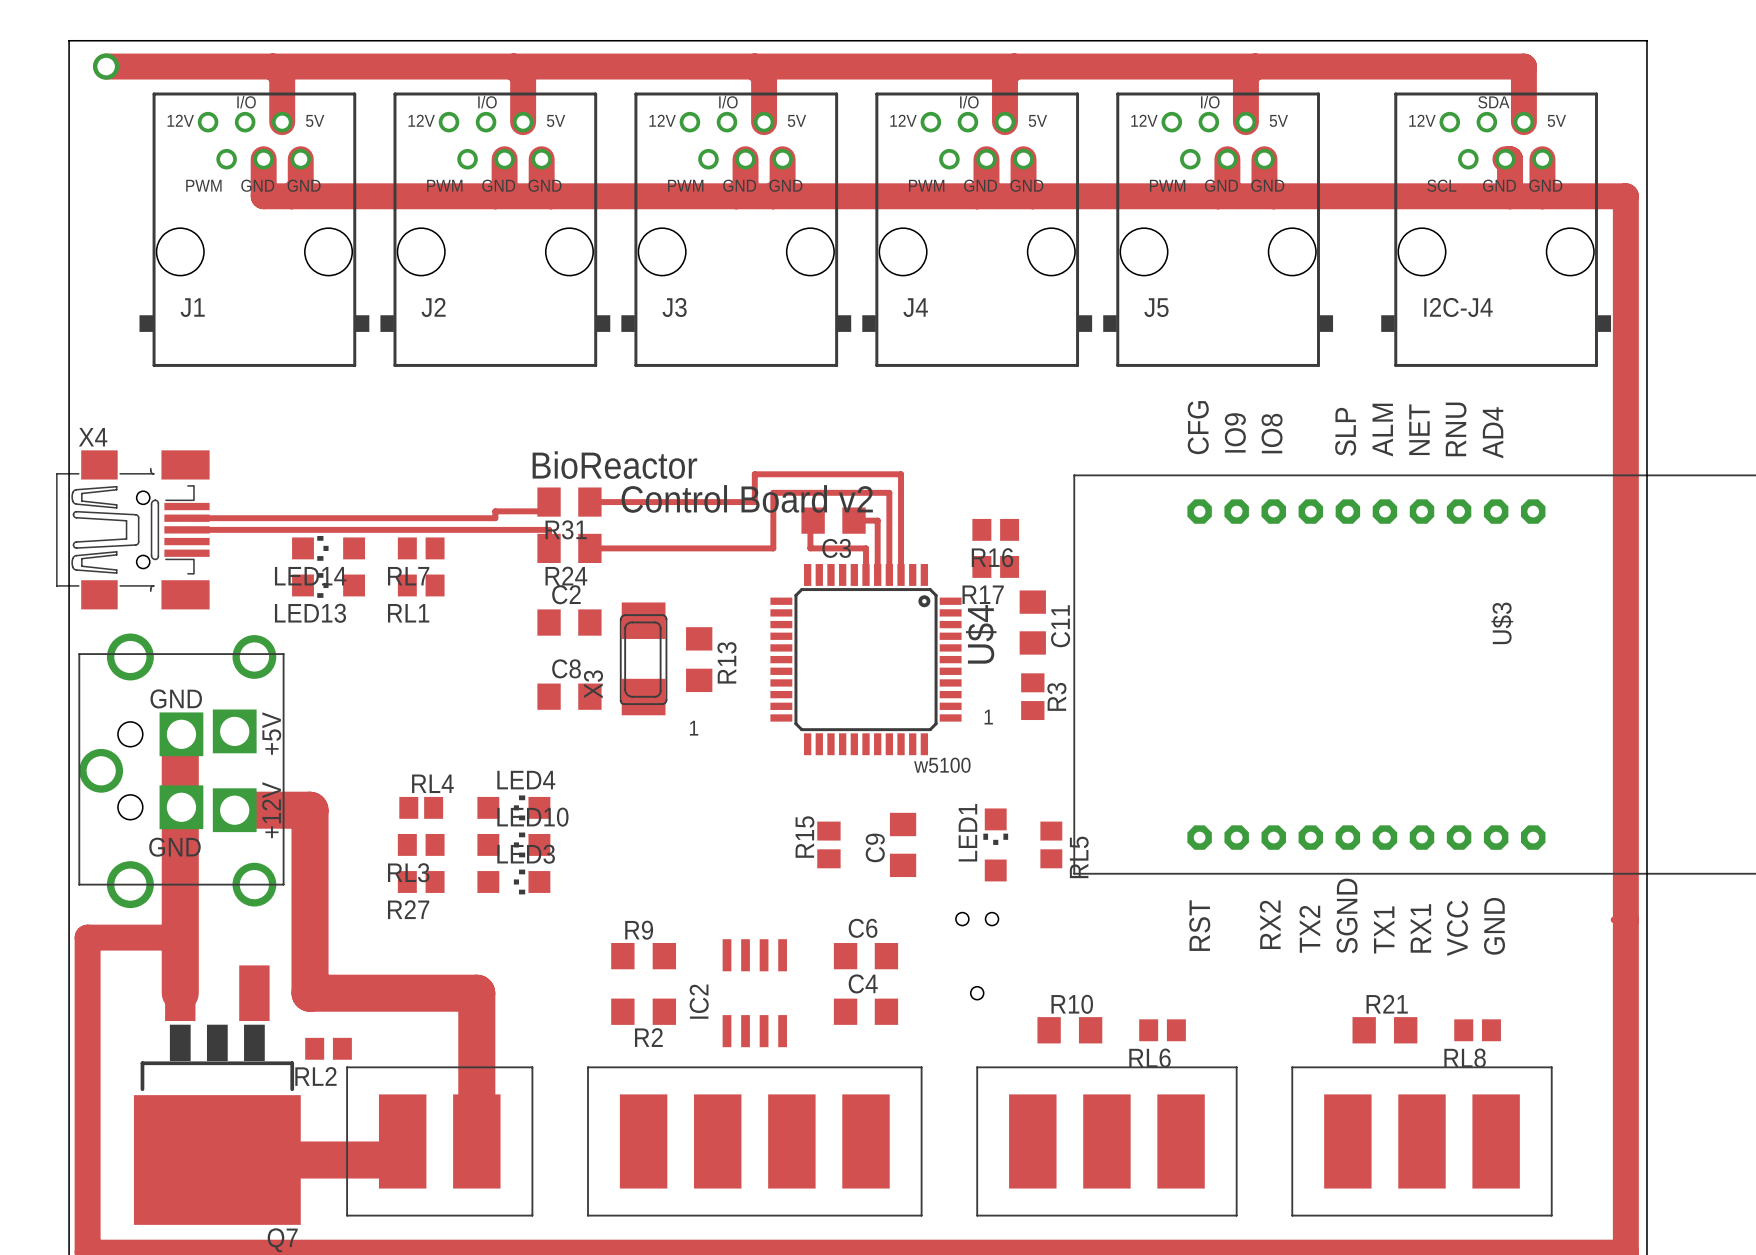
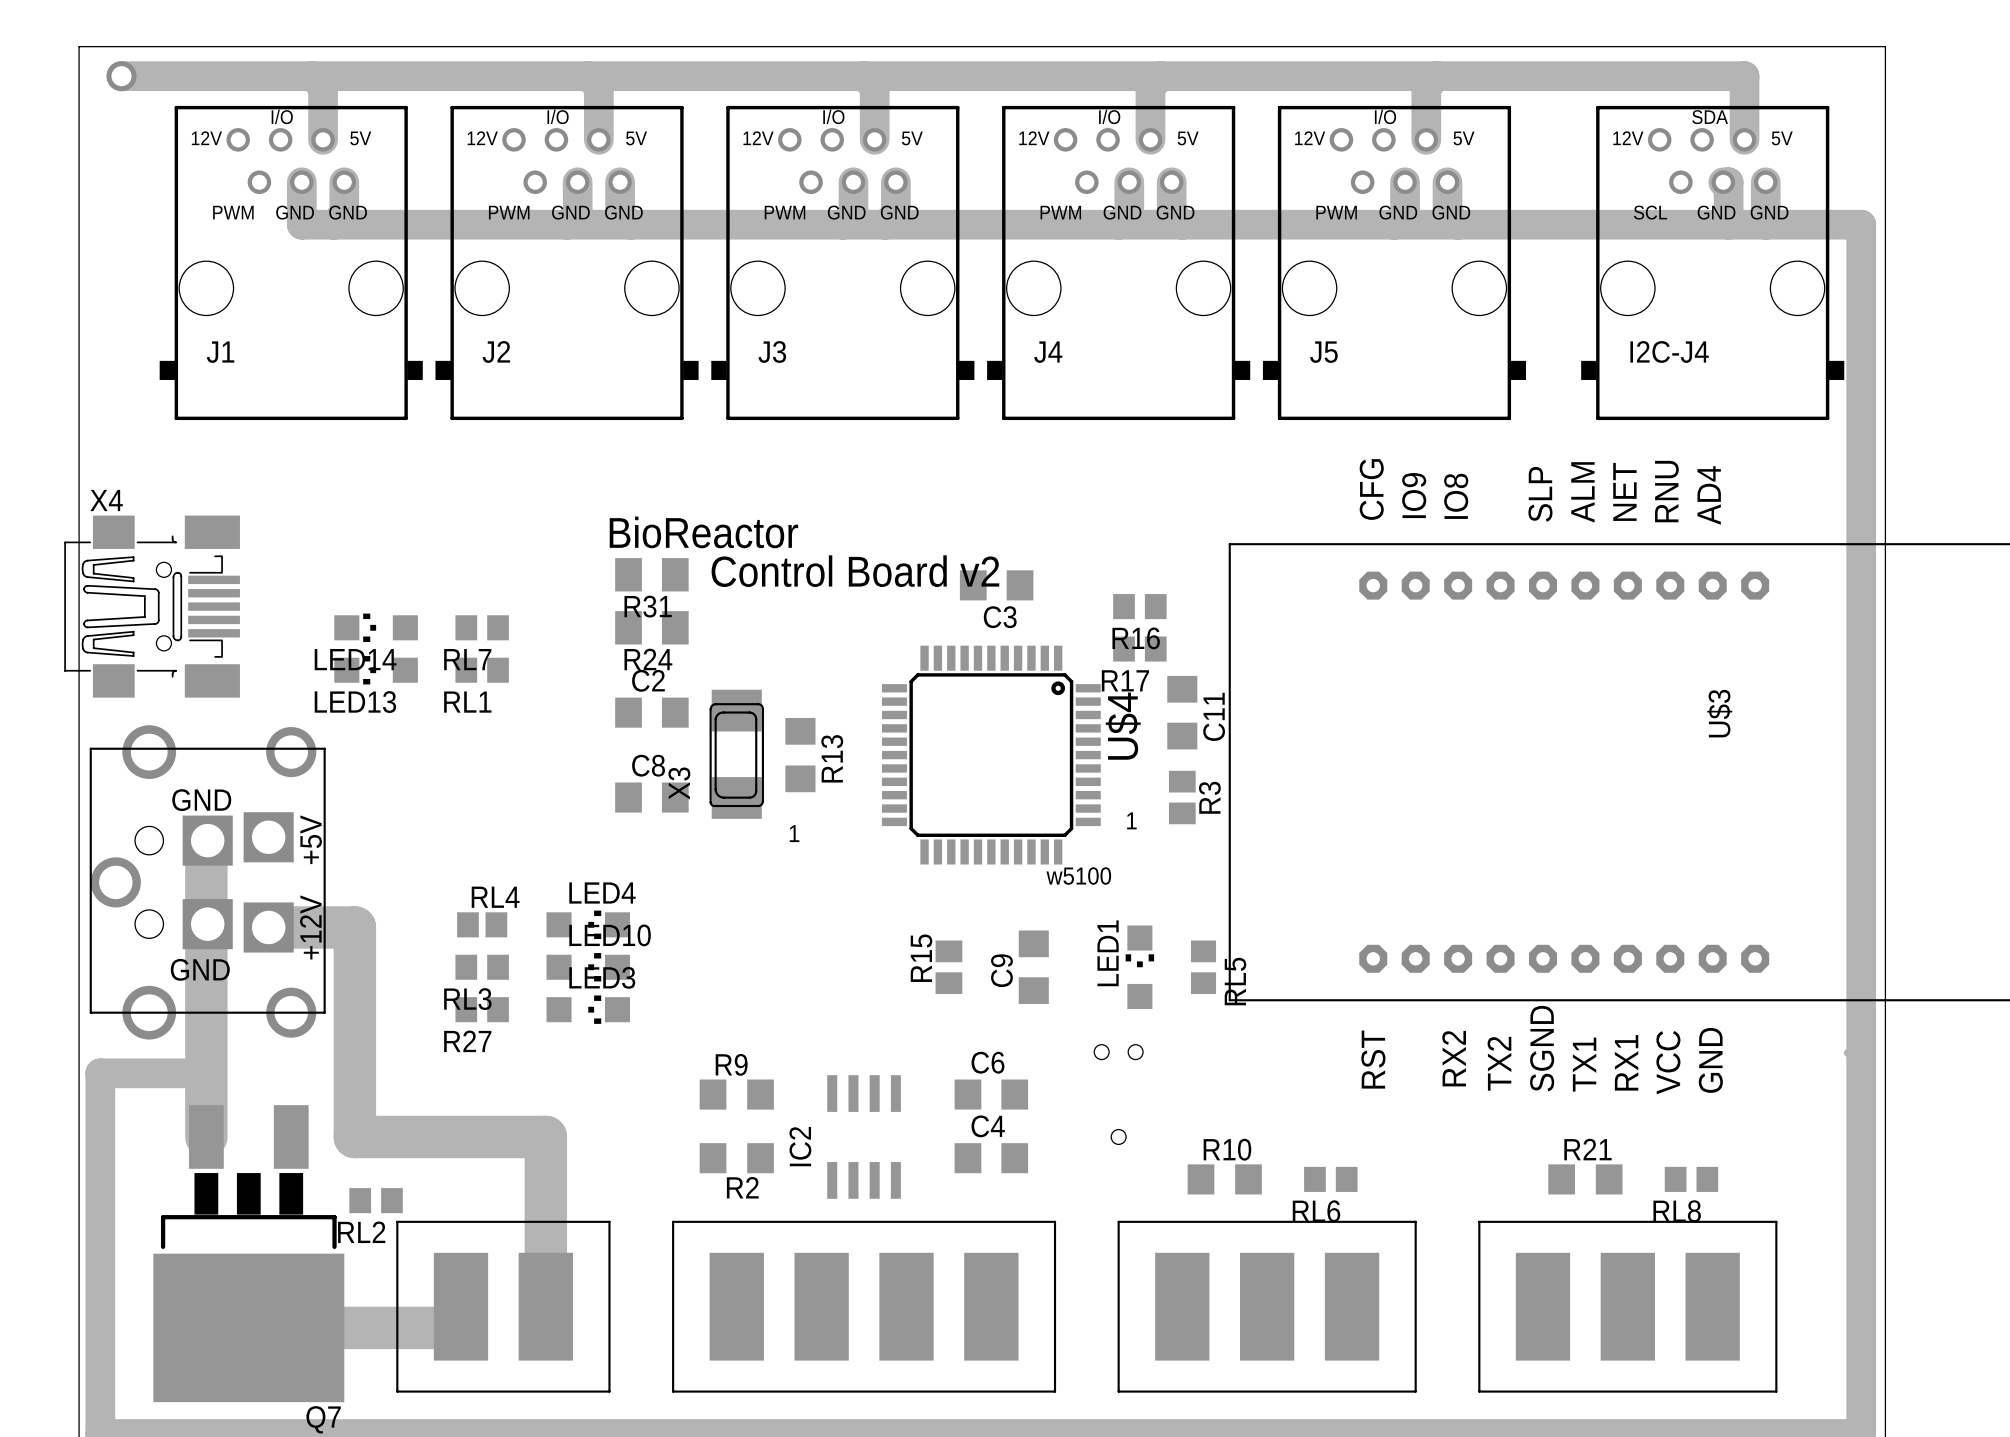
track: (549, 502) (549, 511) (495, 511) (495, 518) (186, 518) -> none
track: (589, 502) (754, 502) (754, 474) (901, 474) (901, 574) -> none
track: (813, 520) (810, 529) (810, 548) (866, 548) (866, 574) -> none
C3 position: (833, 520) -> (996, 585)
track: (854, 520) (877, 520) (877, 574) -> none
track: (186, 529) (549, 529) (549, 548) -> none
track: (589, 548) (773, 548) (773, 492) (889, 492) (889, 574) -> none

